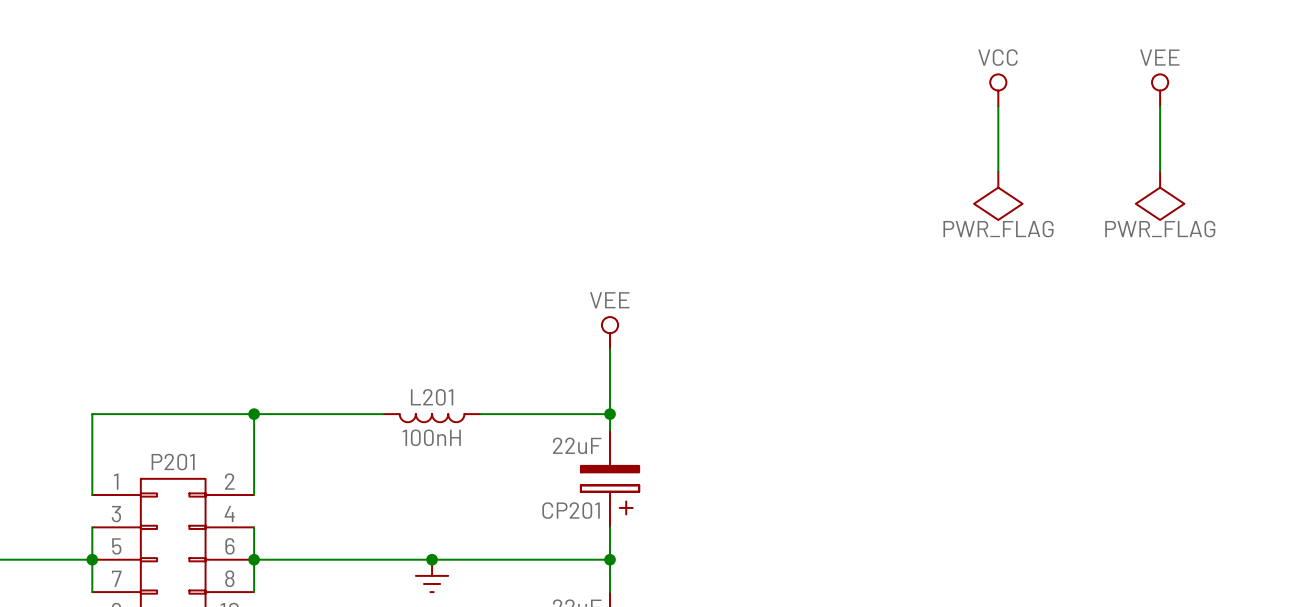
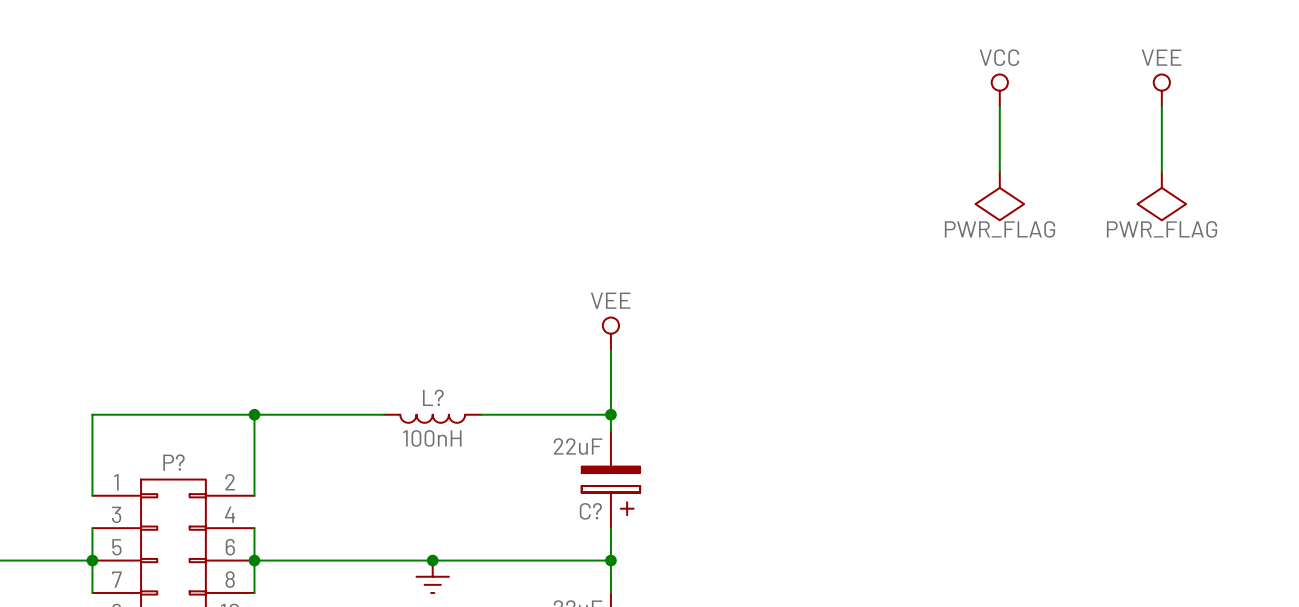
L201 name: L201 (432, 397) -> L? (433, 397)
P201 name: P201 (173, 462) -> P? (173, 462)
CP201 name: CP201 (571, 510) -> C? (590, 511)

